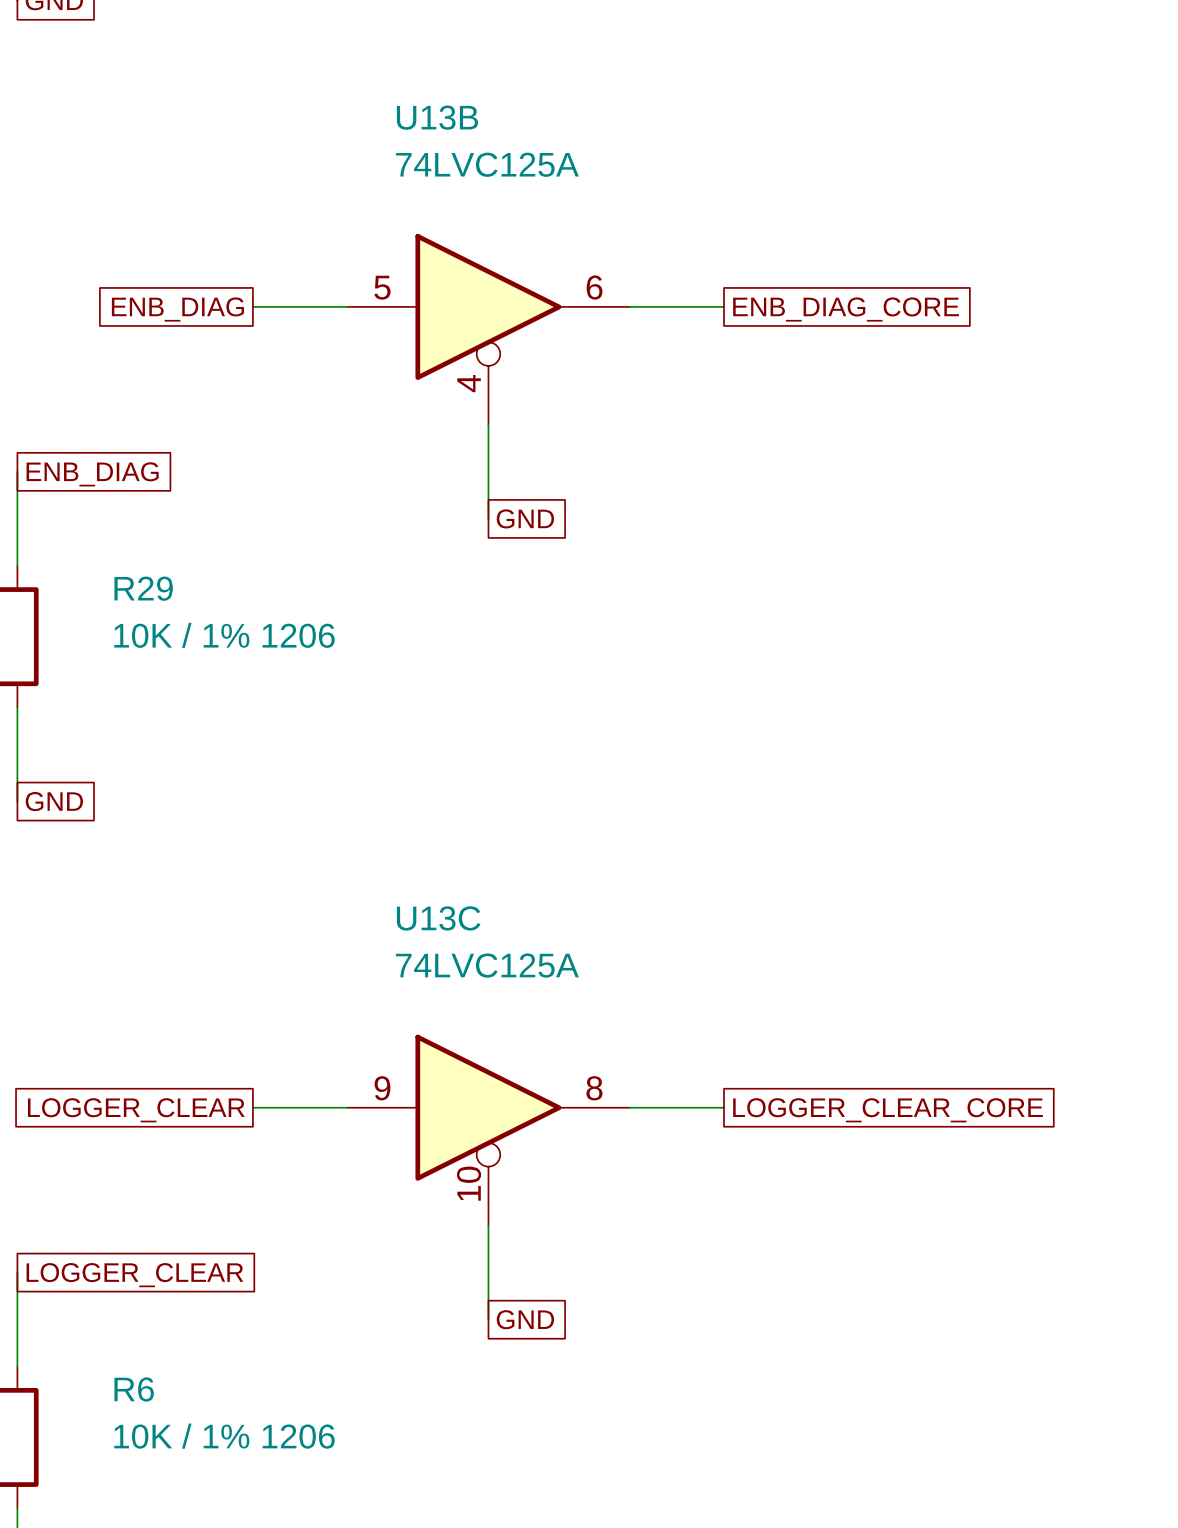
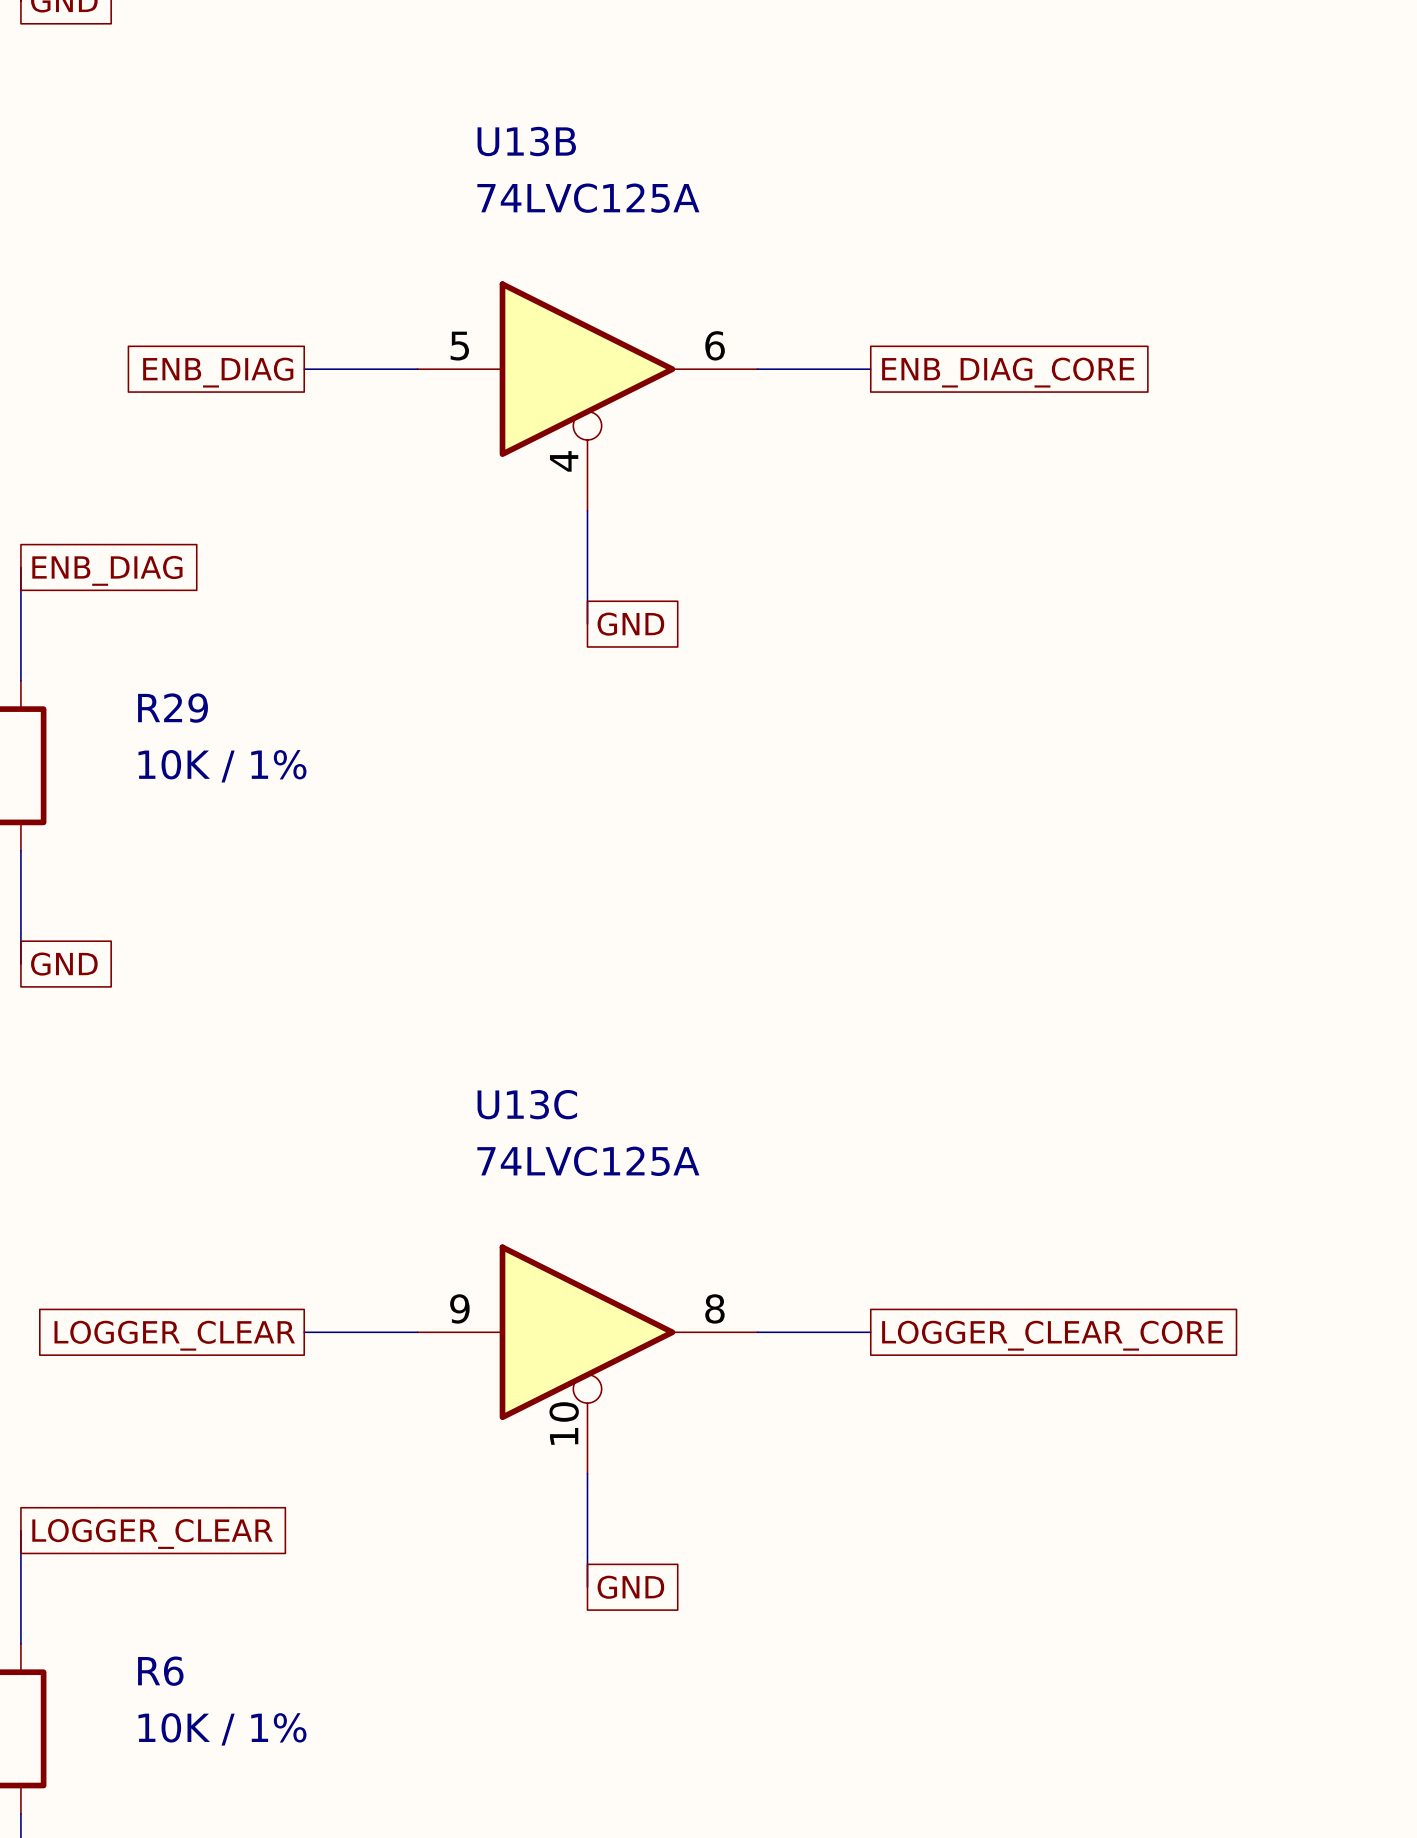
R29 value: 10K / 1% 1206 (224, 635) -> 10K / 1% (222, 766)
R6 value: 10K / 1% 1206 (224, 1436) -> 10K / 1% (222, 1729)

